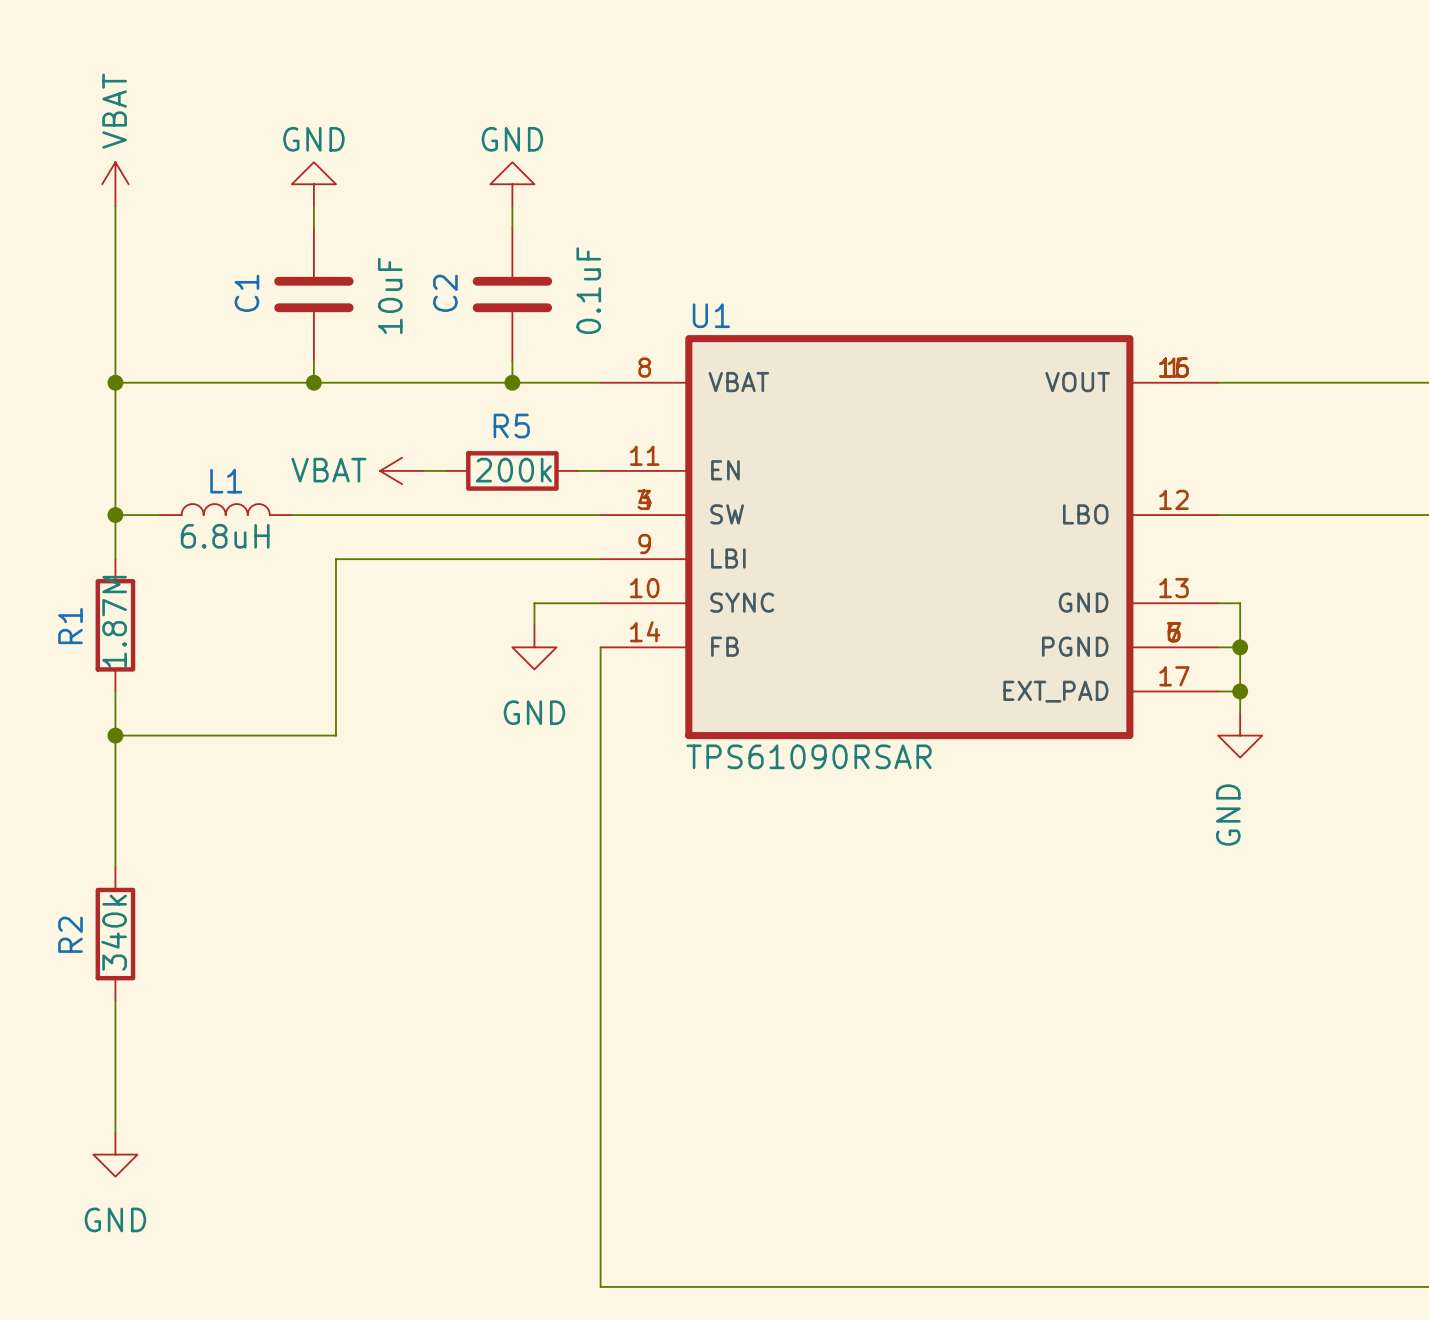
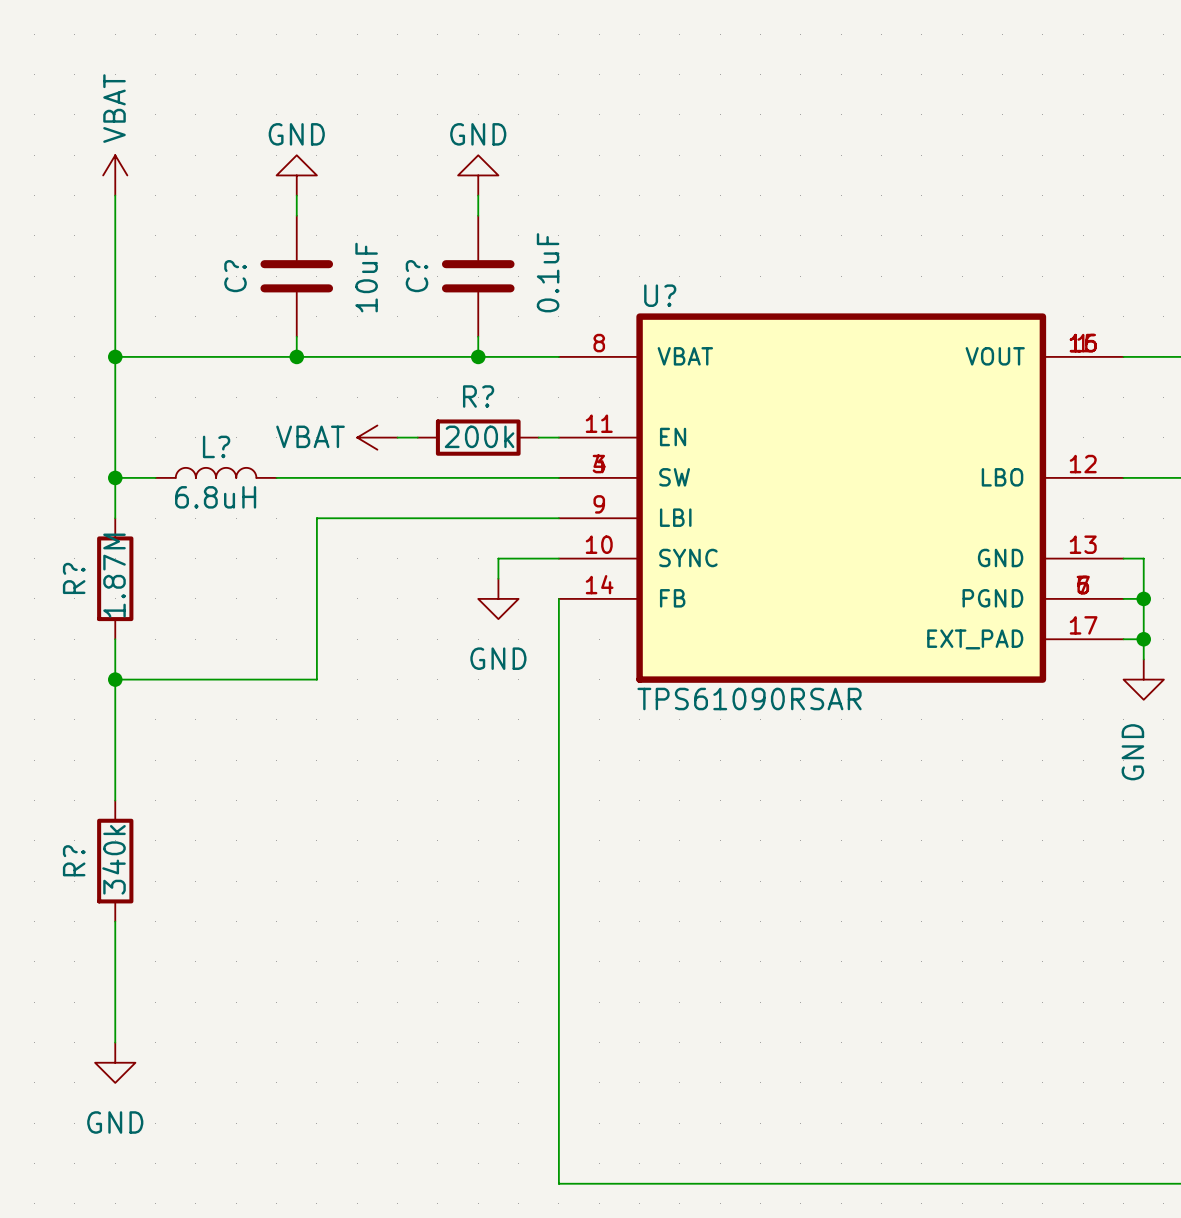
C1 name: C1 (246, 293) -> C? (235, 276)
C2 name: C2 (445, 293) -> C? (417, 276)
U1 name: U1 (711, 315) -> U? (660, 295)
R5 name: R5 (511, 426) -> R? (478, 396)
L1 name: L1 (226, 481) -> L? (216, 446)
R1 name: R1 (70, 626) -> R? (74, 578)
R2 name: R2 (70, 934) -> R? (74, 860)

